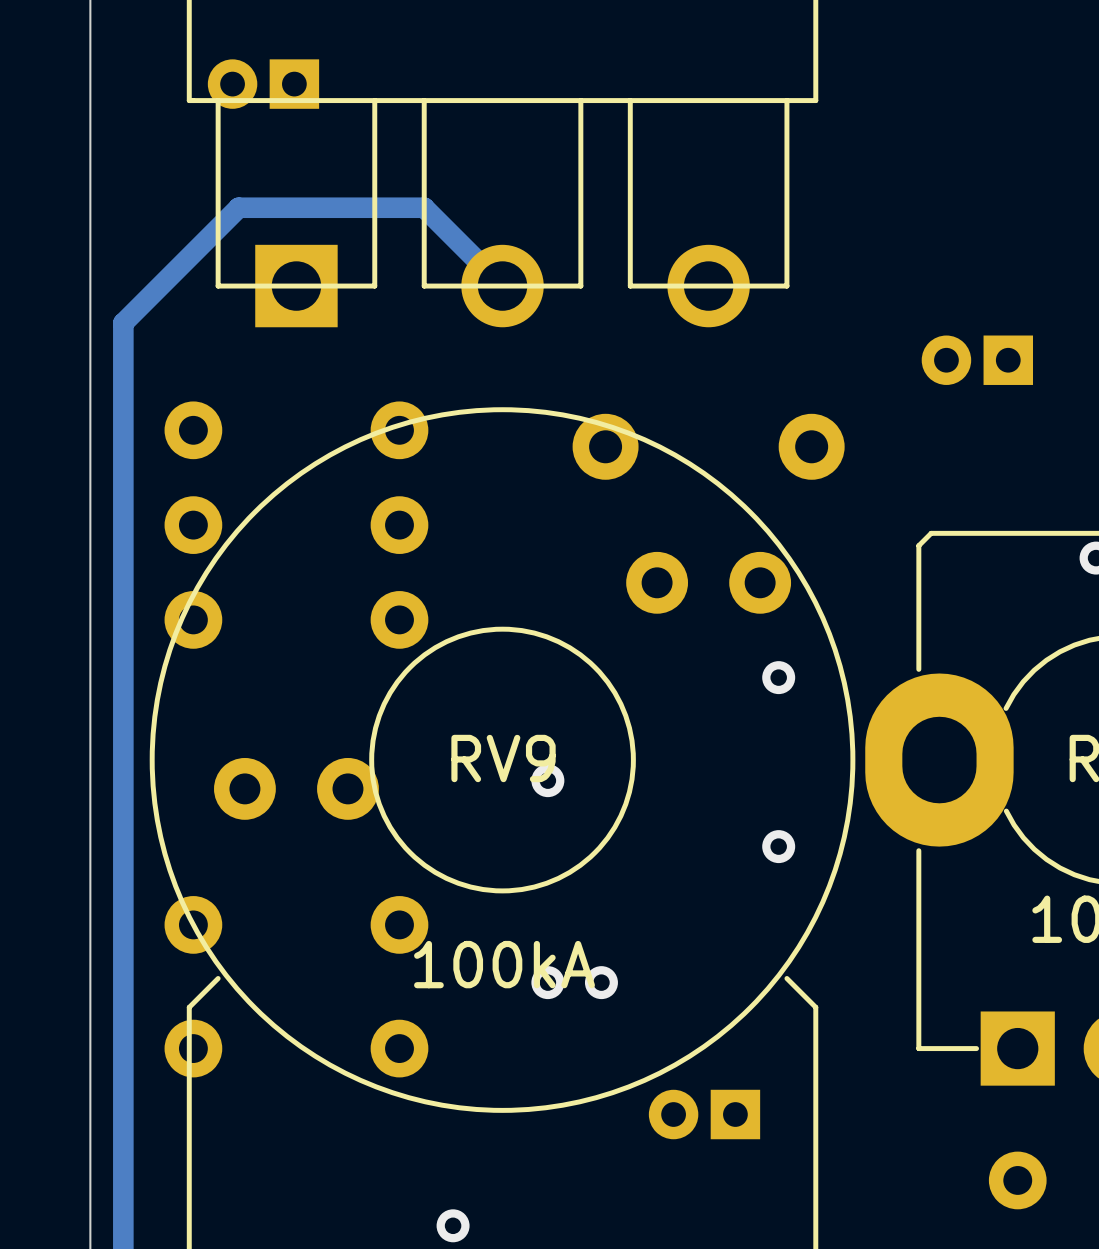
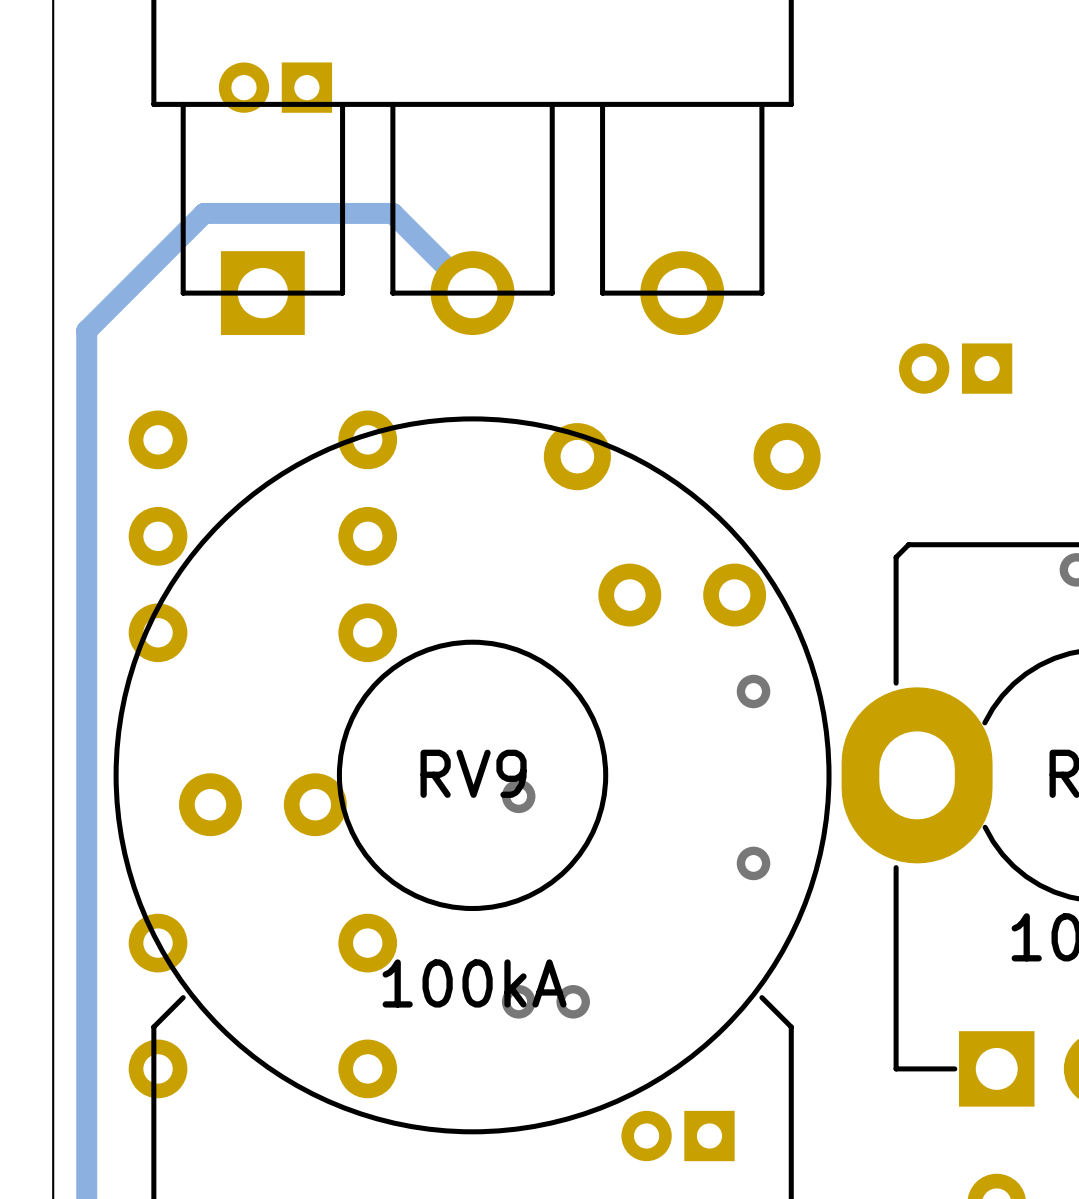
part position: (263, 84) -> (275, 87)

